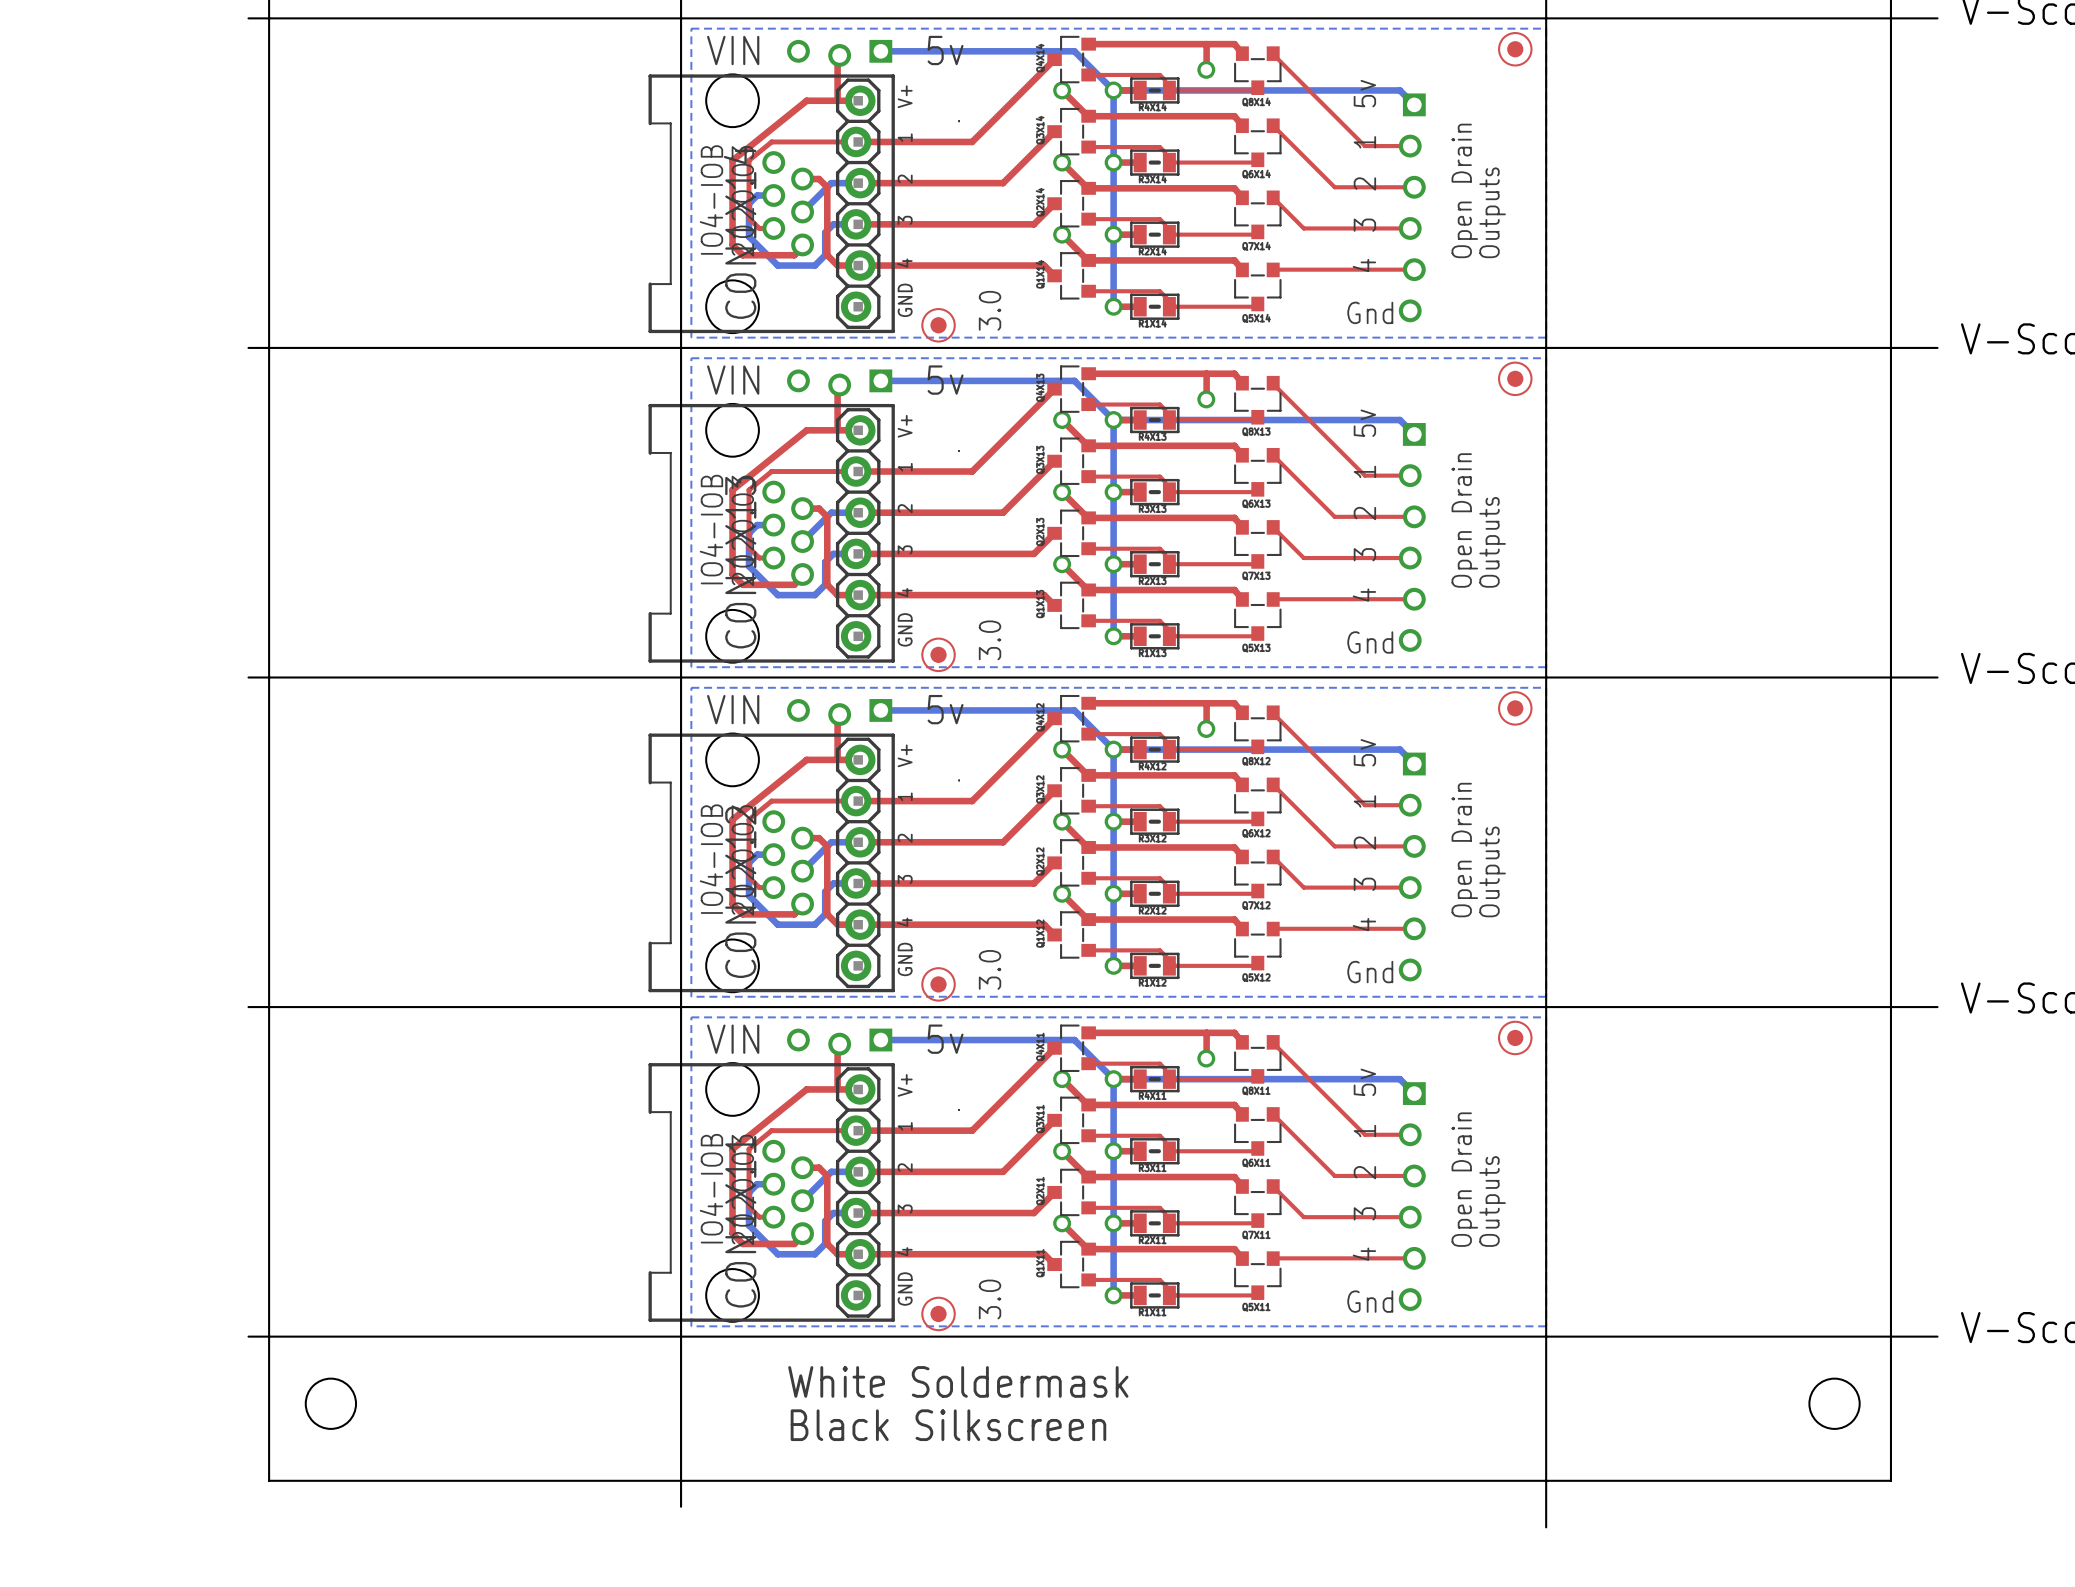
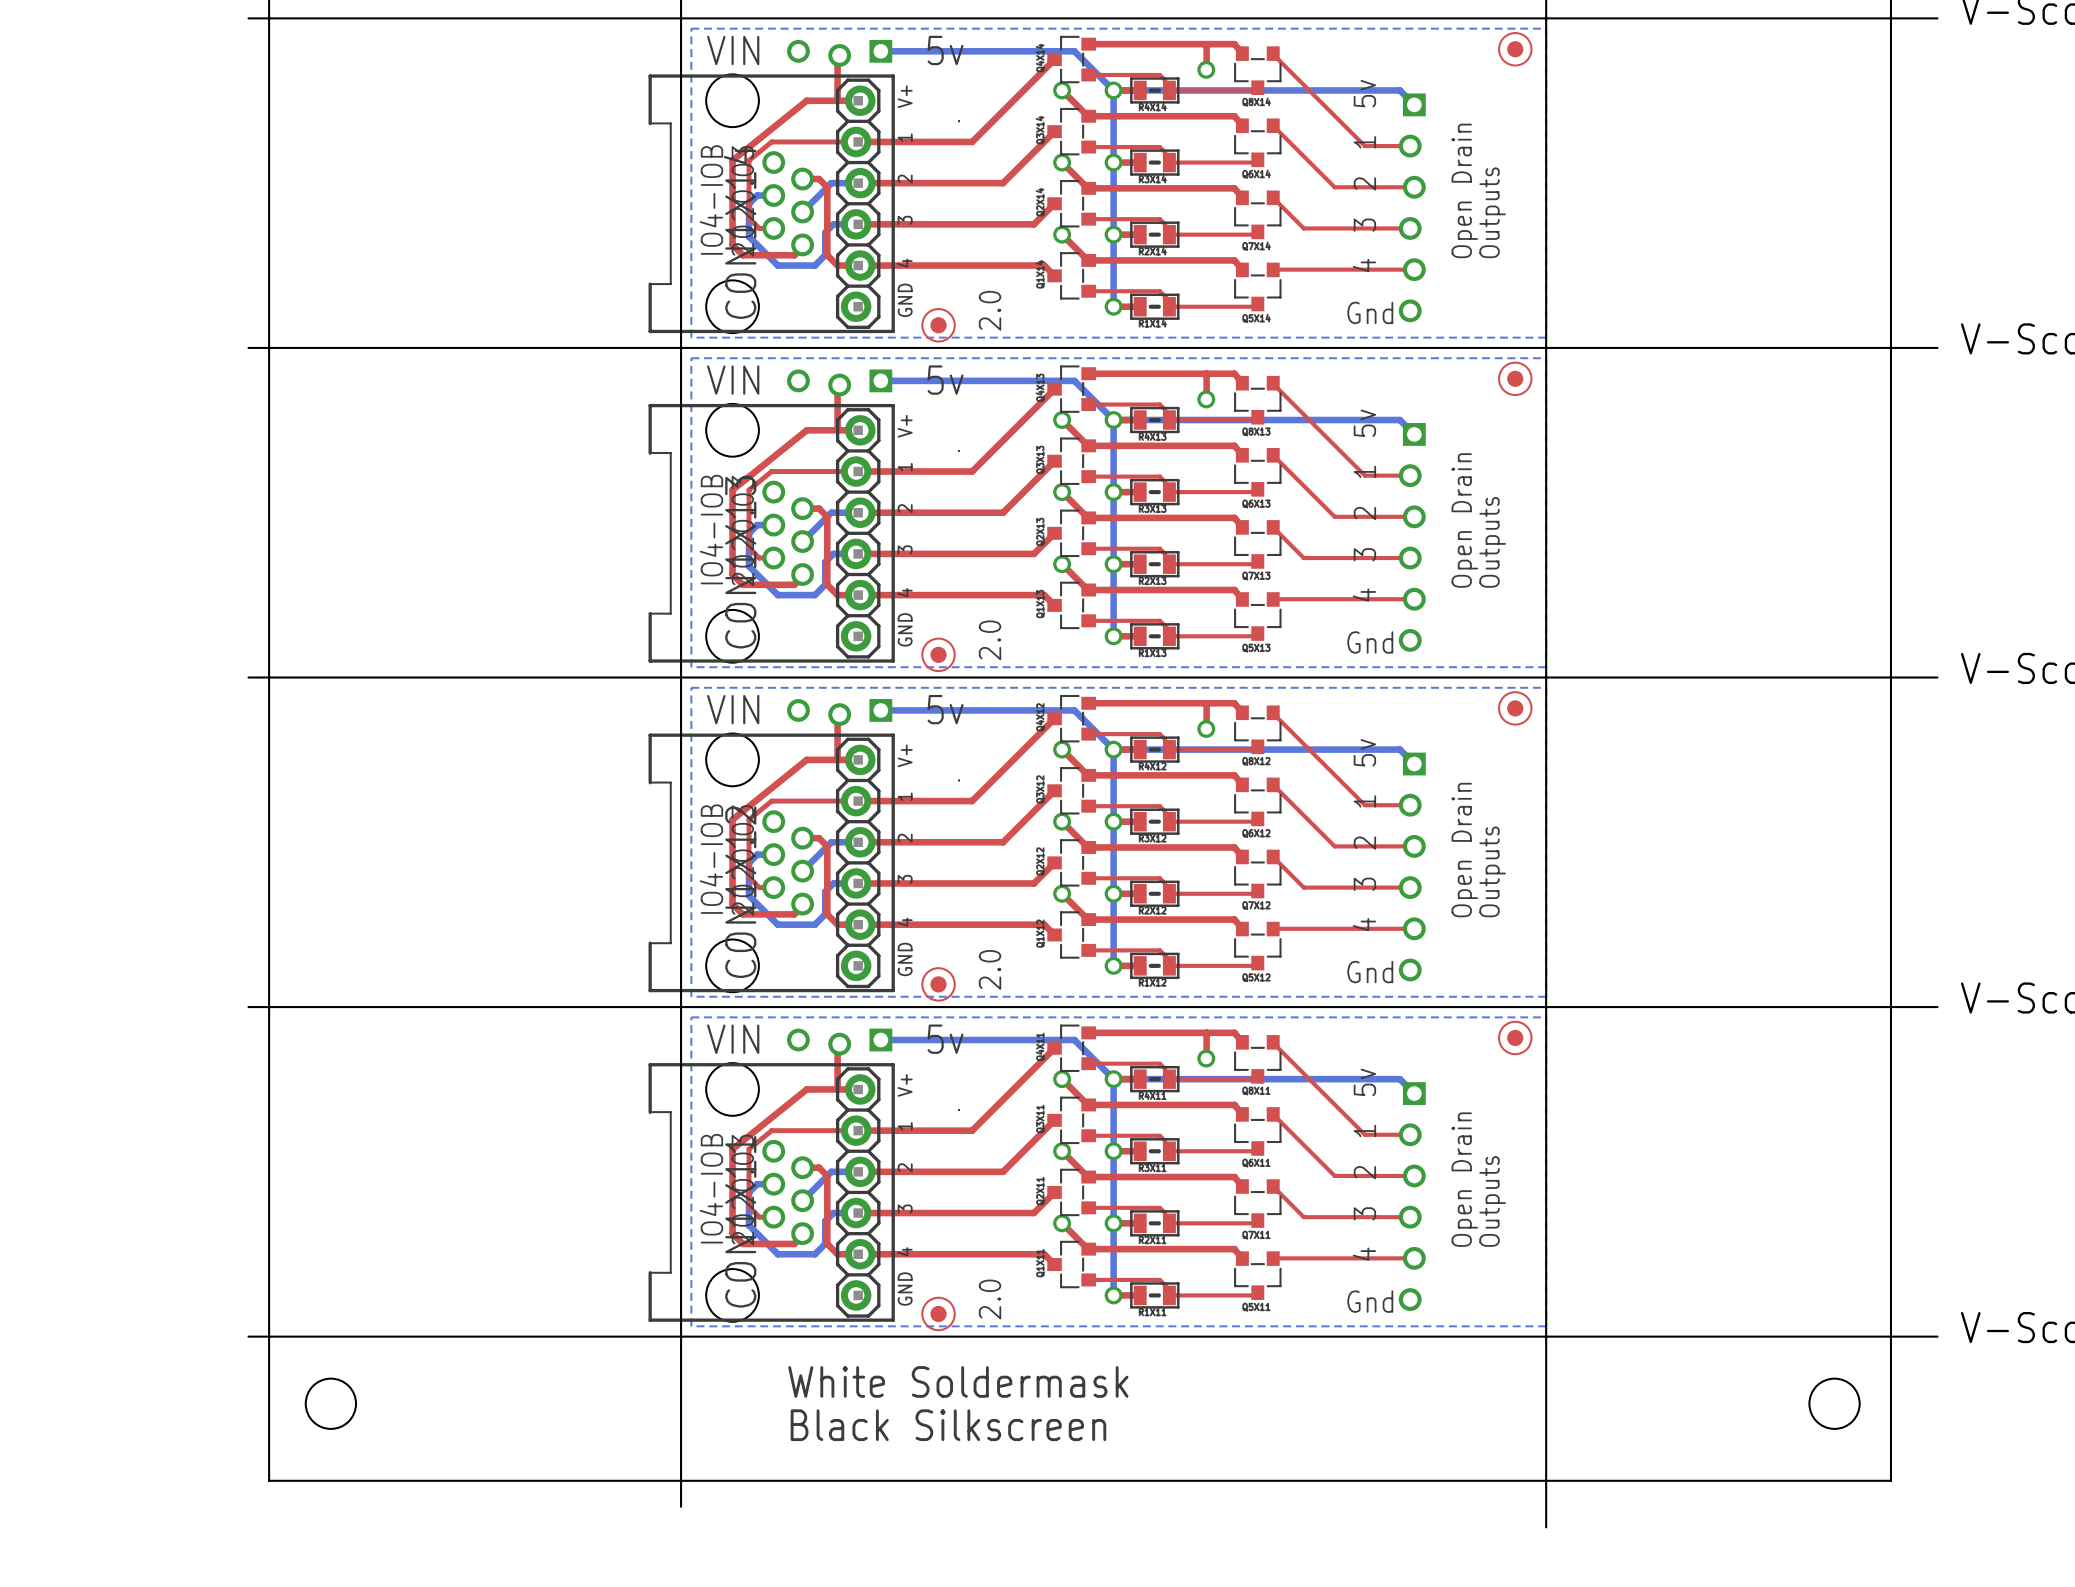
text: 3.0 (990, 310) -> 2.0 (990, 310)
text: 3.0 (990, 640) -> 2.0 (990, 640)
text: 3.0 (990, 969) -> 2.0 (990, 969)
text: 3.0 (990, 1299) -> 2.0 (990, 1299)

